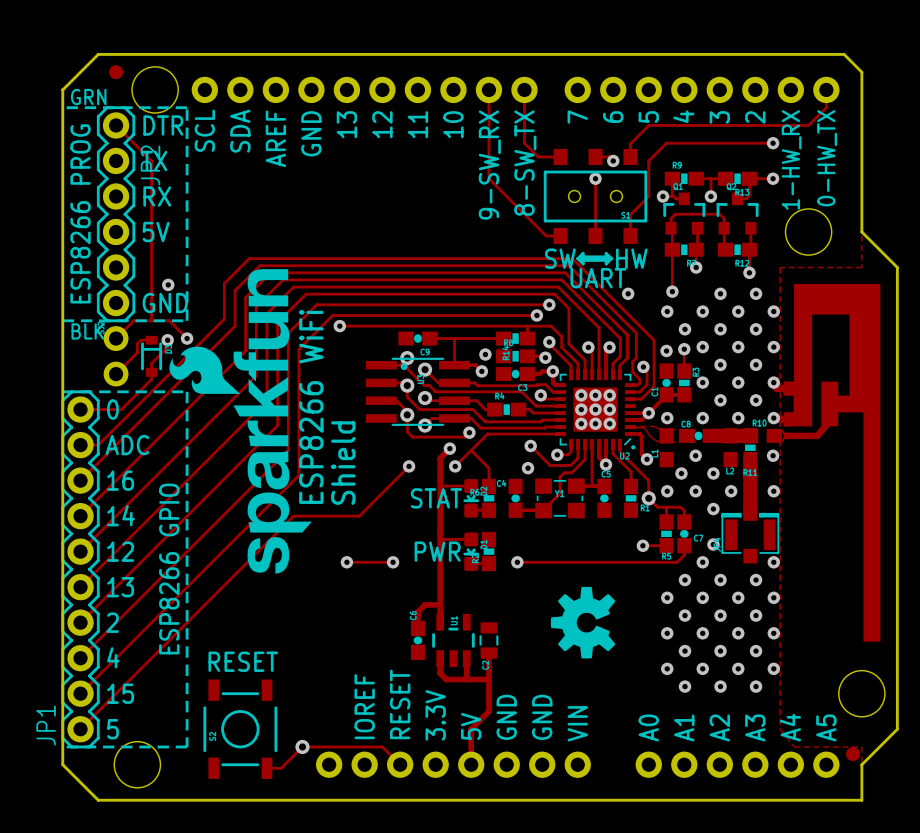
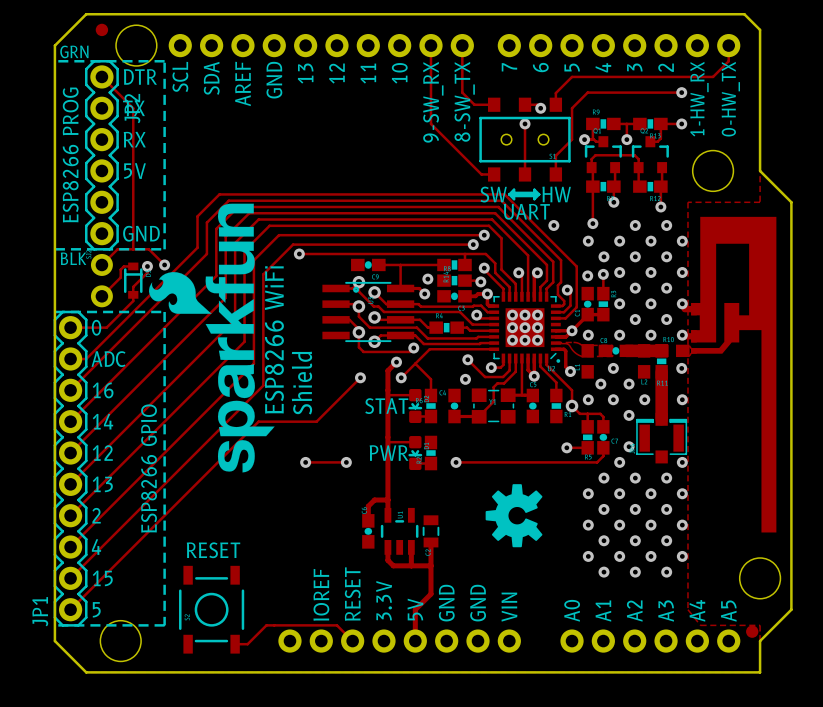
via: (168, 284) -> none
via: (302, 746) -> none

